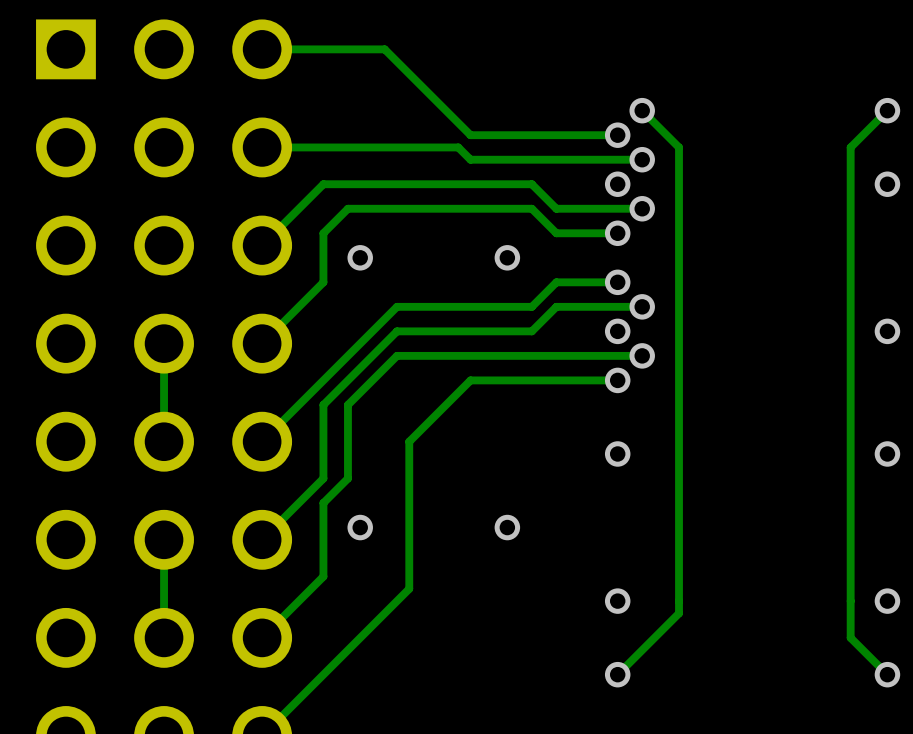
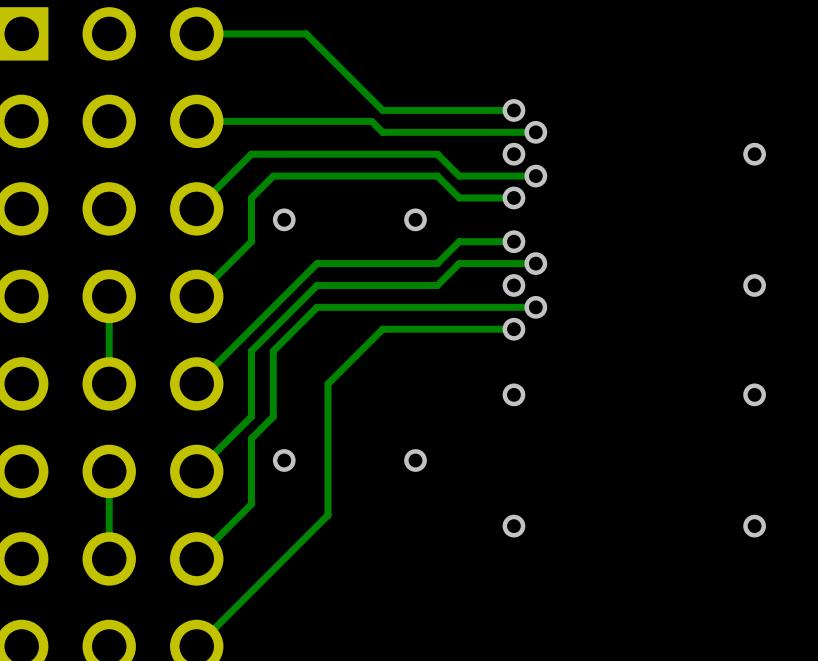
track: (642, 110) (679, 147) (679, 613) (617, 674) -> none
via: (642, 110) -> none
track: (887, 110) (850, 147) (850, 637) (887, 674) -> none
via: (887, 110) -> none
via: (617, 674) -> none
via: (887, 674) -> none

